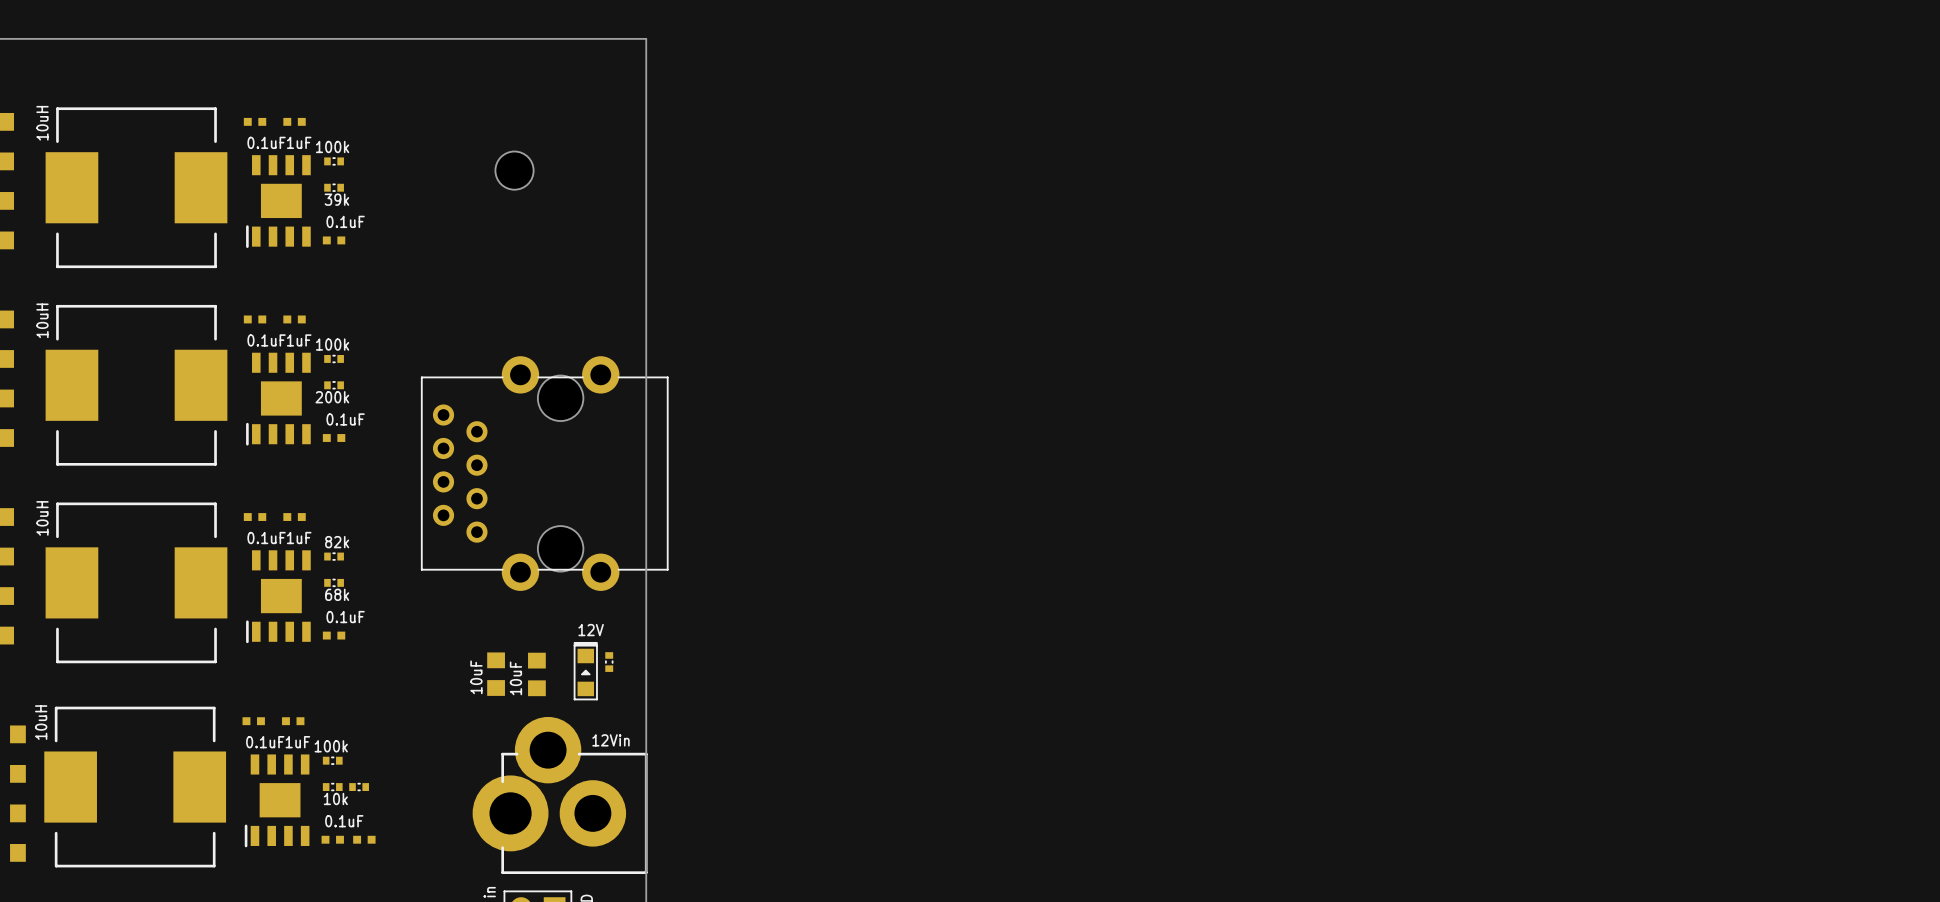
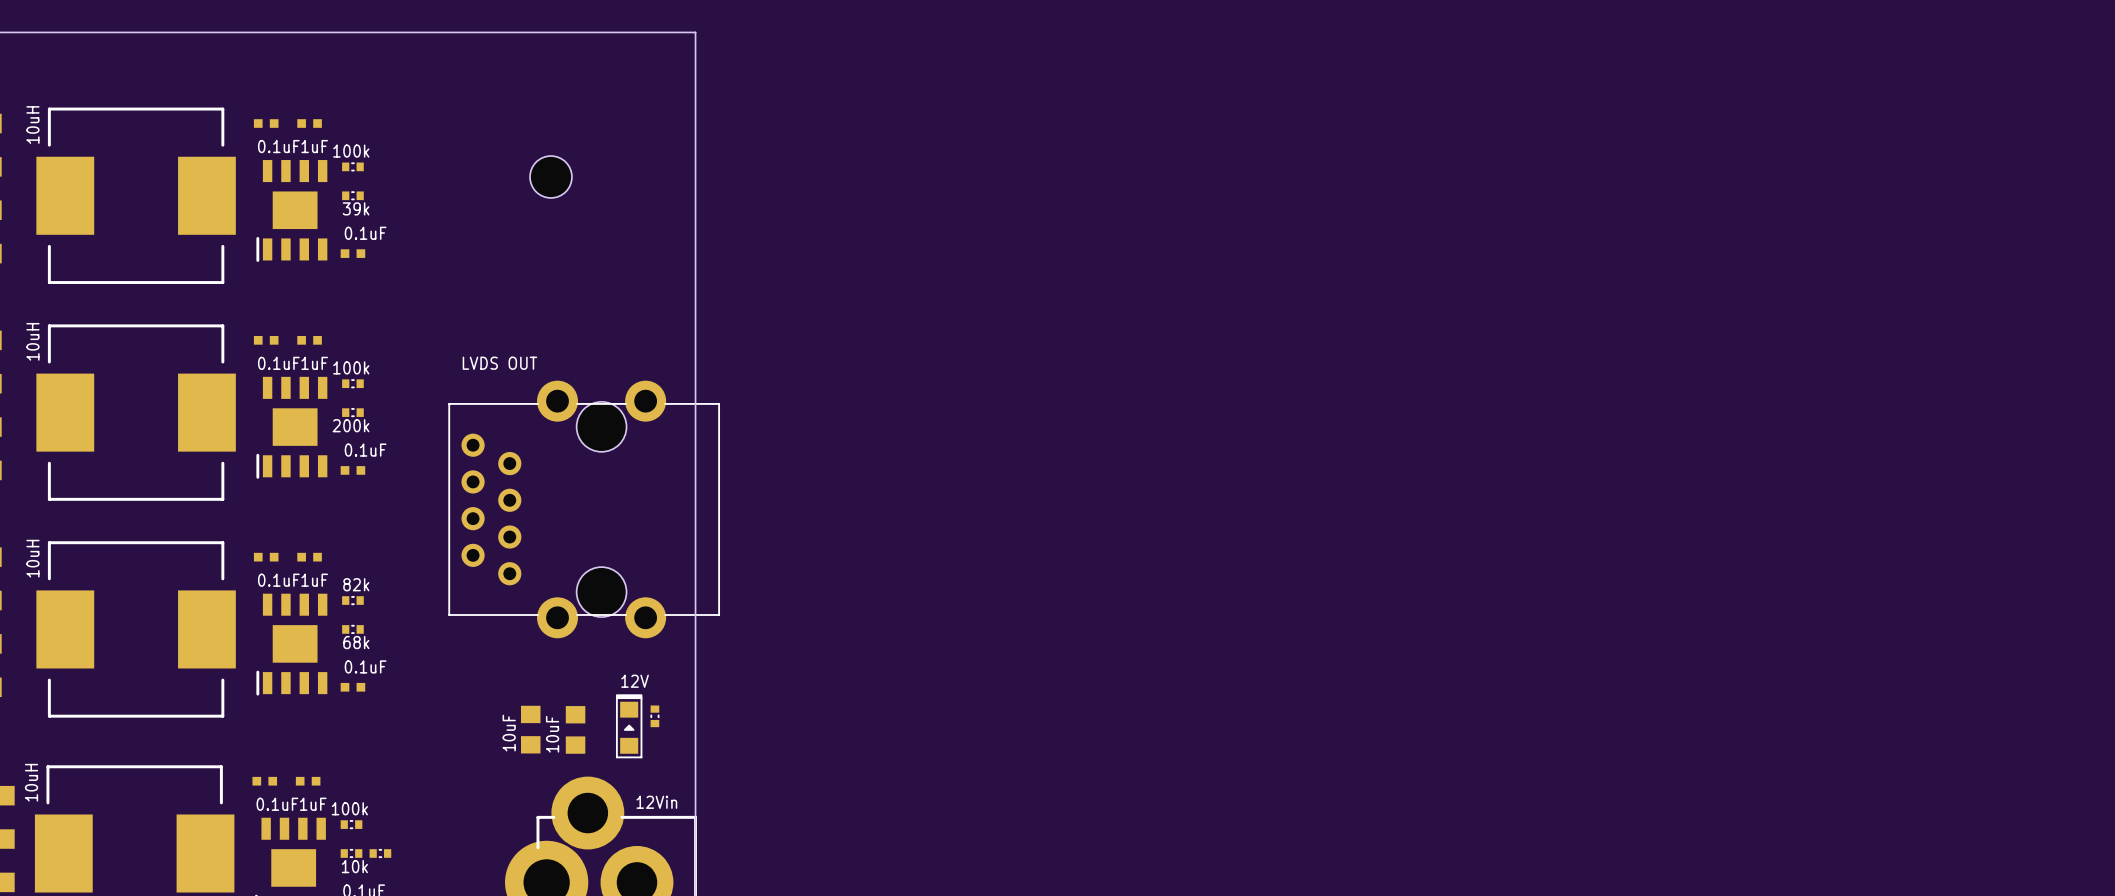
text: none -> LVDS OUT (499, 363)

